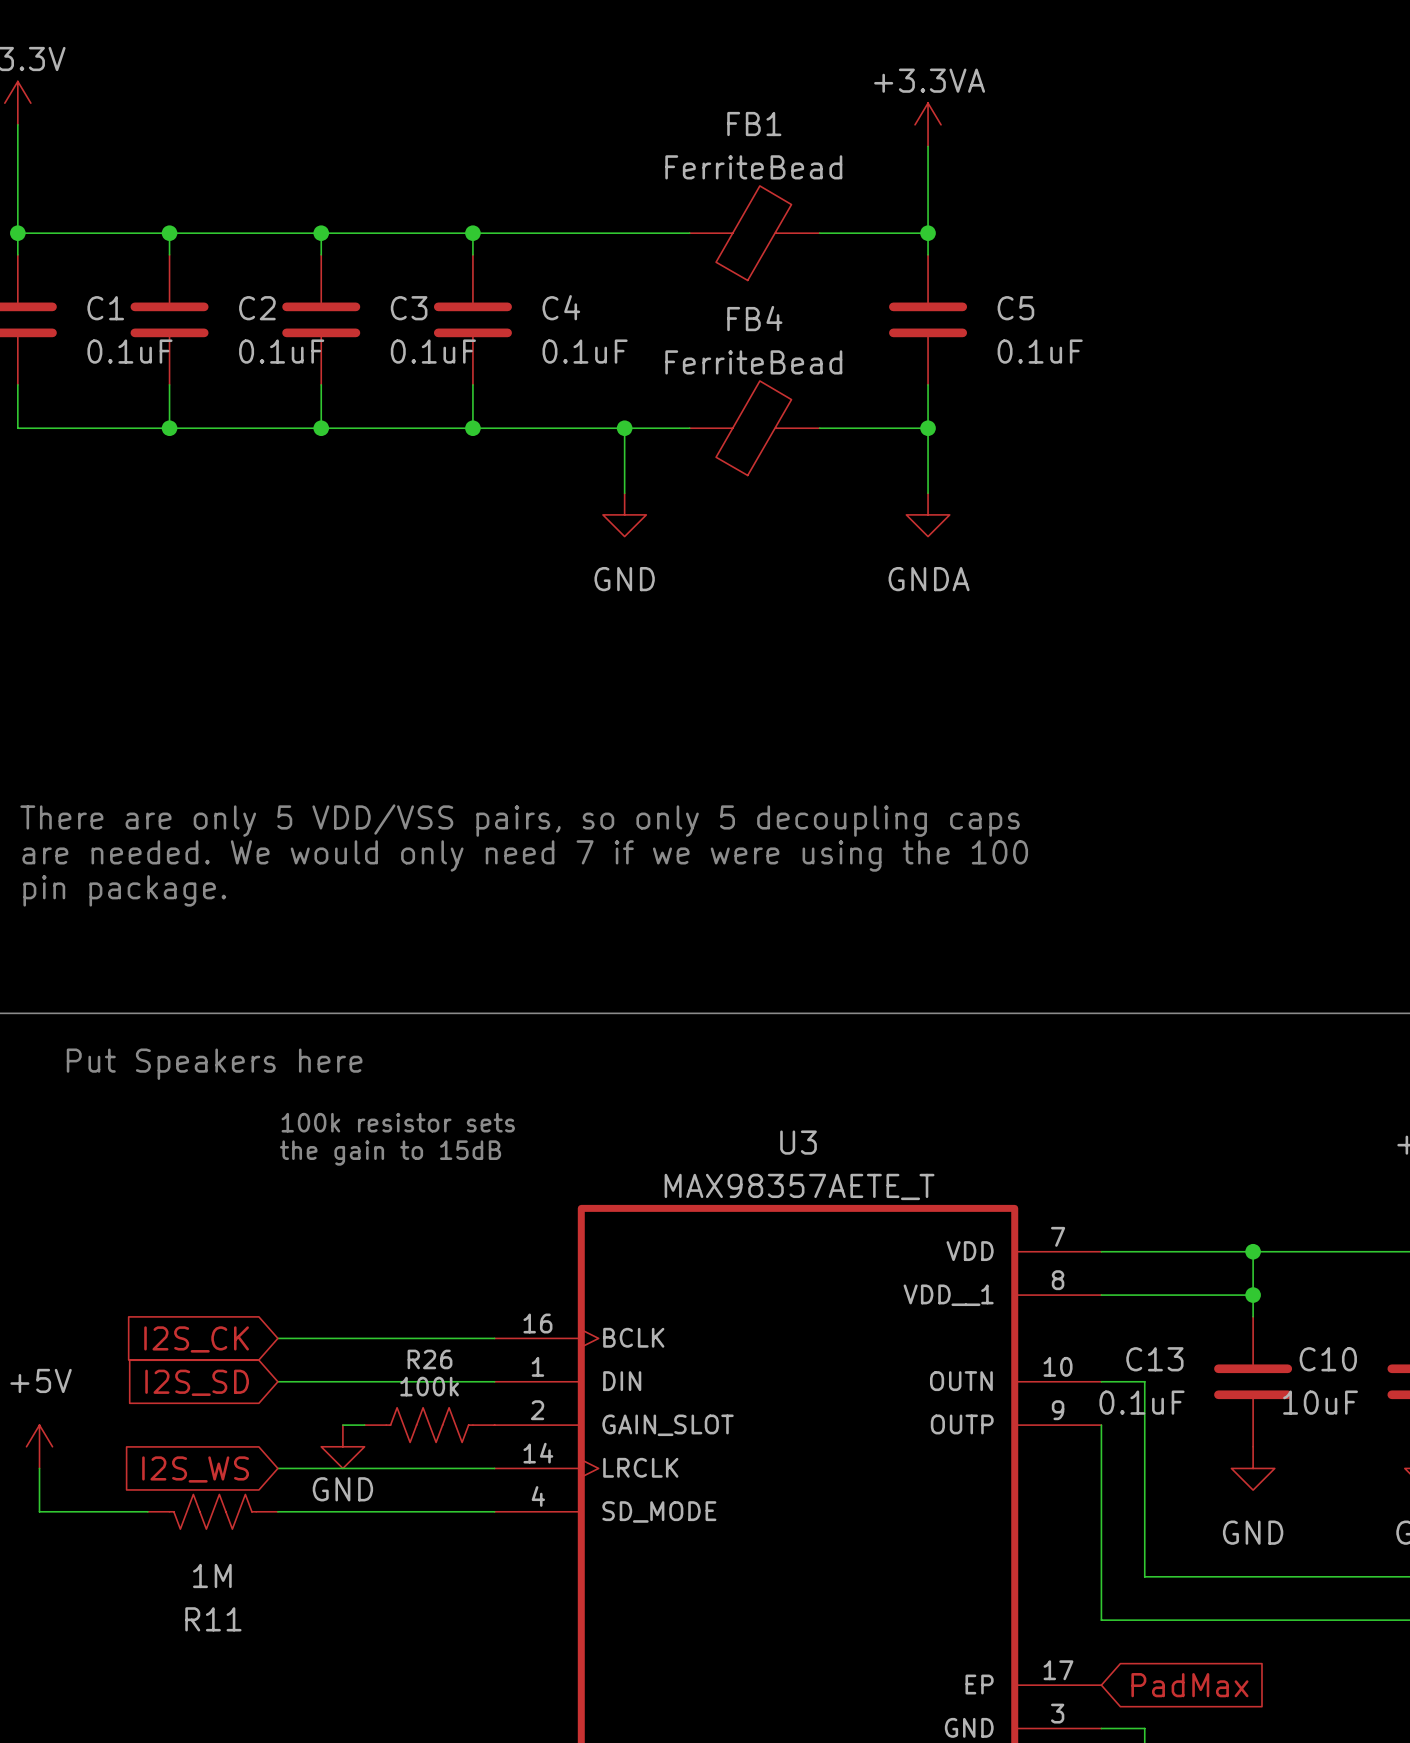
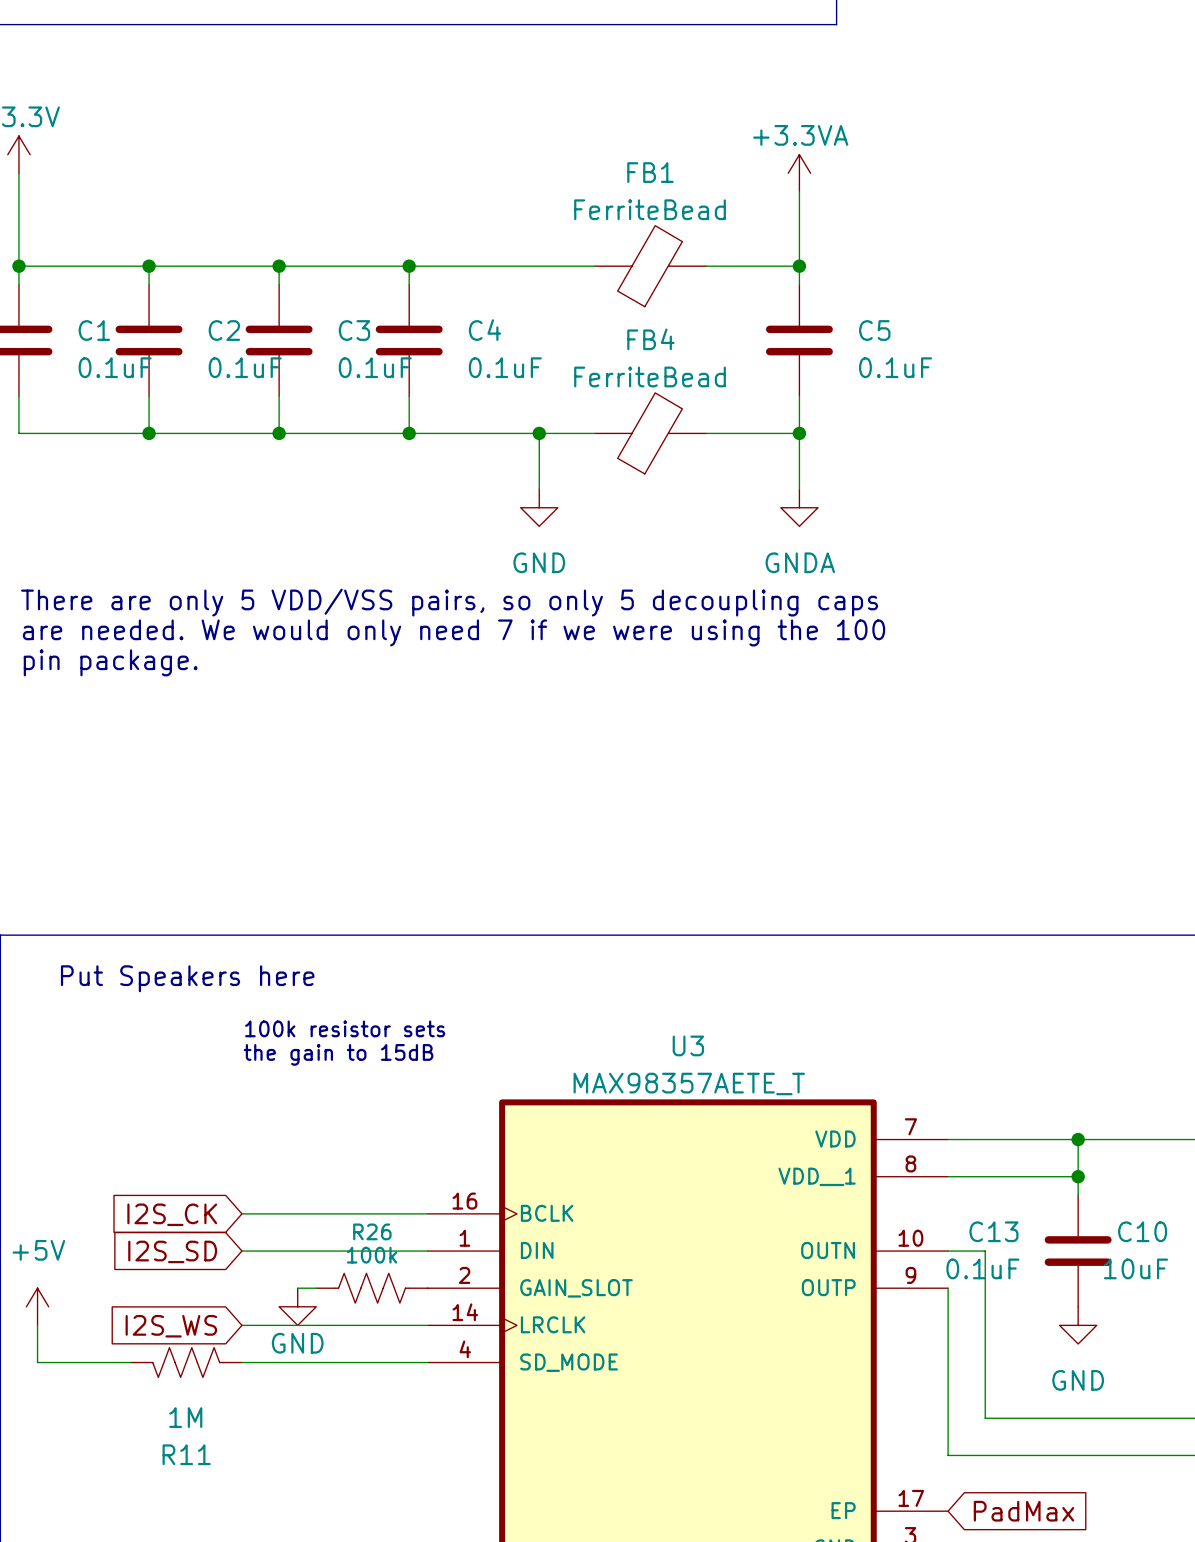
text position: There are only 5 VDD/VSS pairs, so only 5 decoupling caps (520, 820) -> There are only 5 VDD/VSS pairs, so only 5 decoupling caps (449, 602)
text position: are needed. We would only need 7 if we were using the 100 (525, 855) -> are needed. We would only need 7 if we were using the 100 (454, 632)
text position: pin package. (124, 890) -> pin package. (110, 662)

